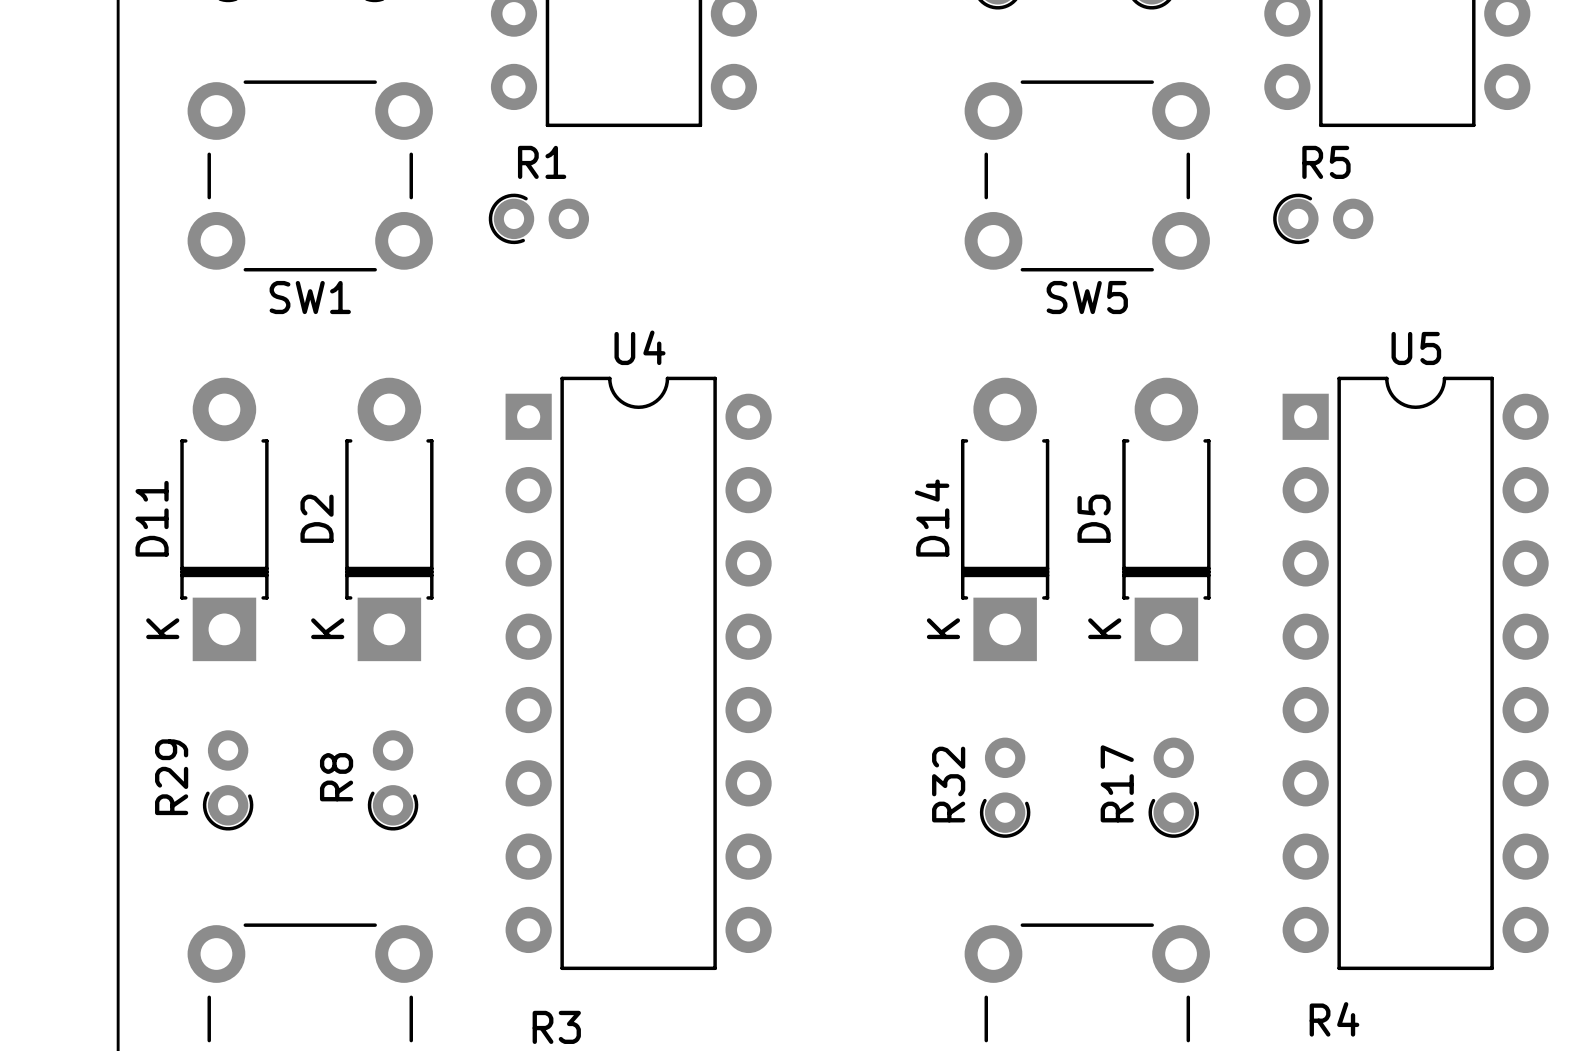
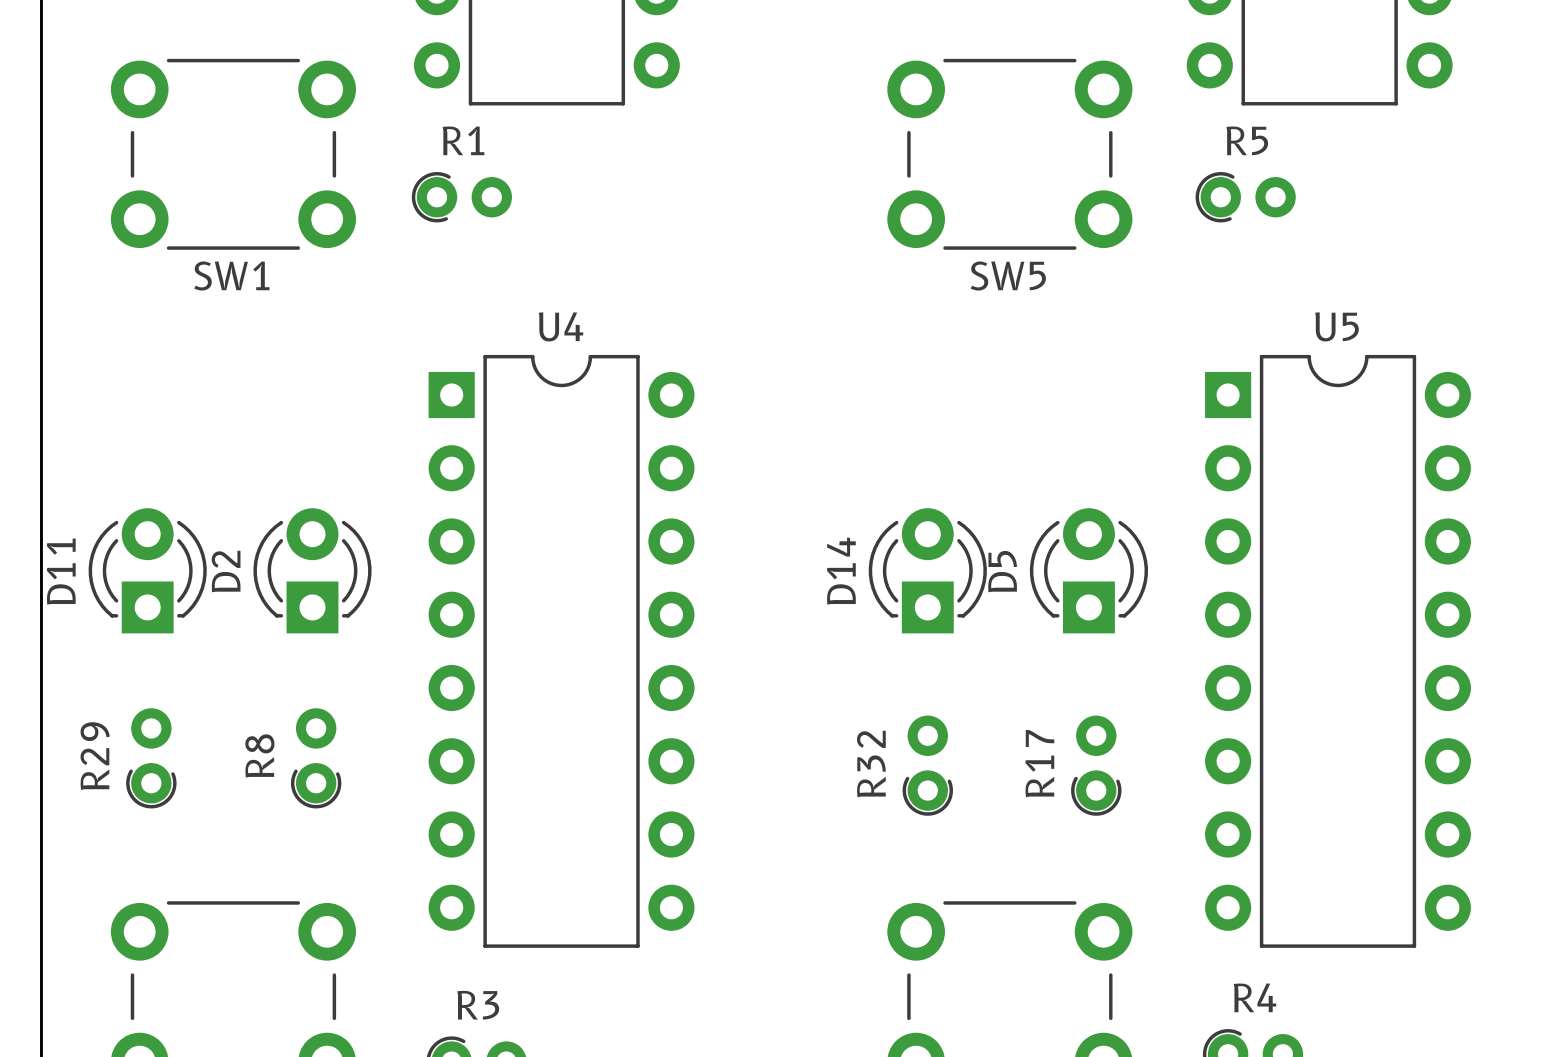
D11 footprint: [180, 377, 269, 662] -> [88, 508, 207, 634]
D2 footprint: [345, 377, 434, 662] -> [253, 508, 372, 634]
D14 footprint: [960, 377, 1050, 662] -> [868, 508, 987, 634]
D5 footprint: [1122, 377, 1211, 662] -> [1029, 508, 1149, 634]

